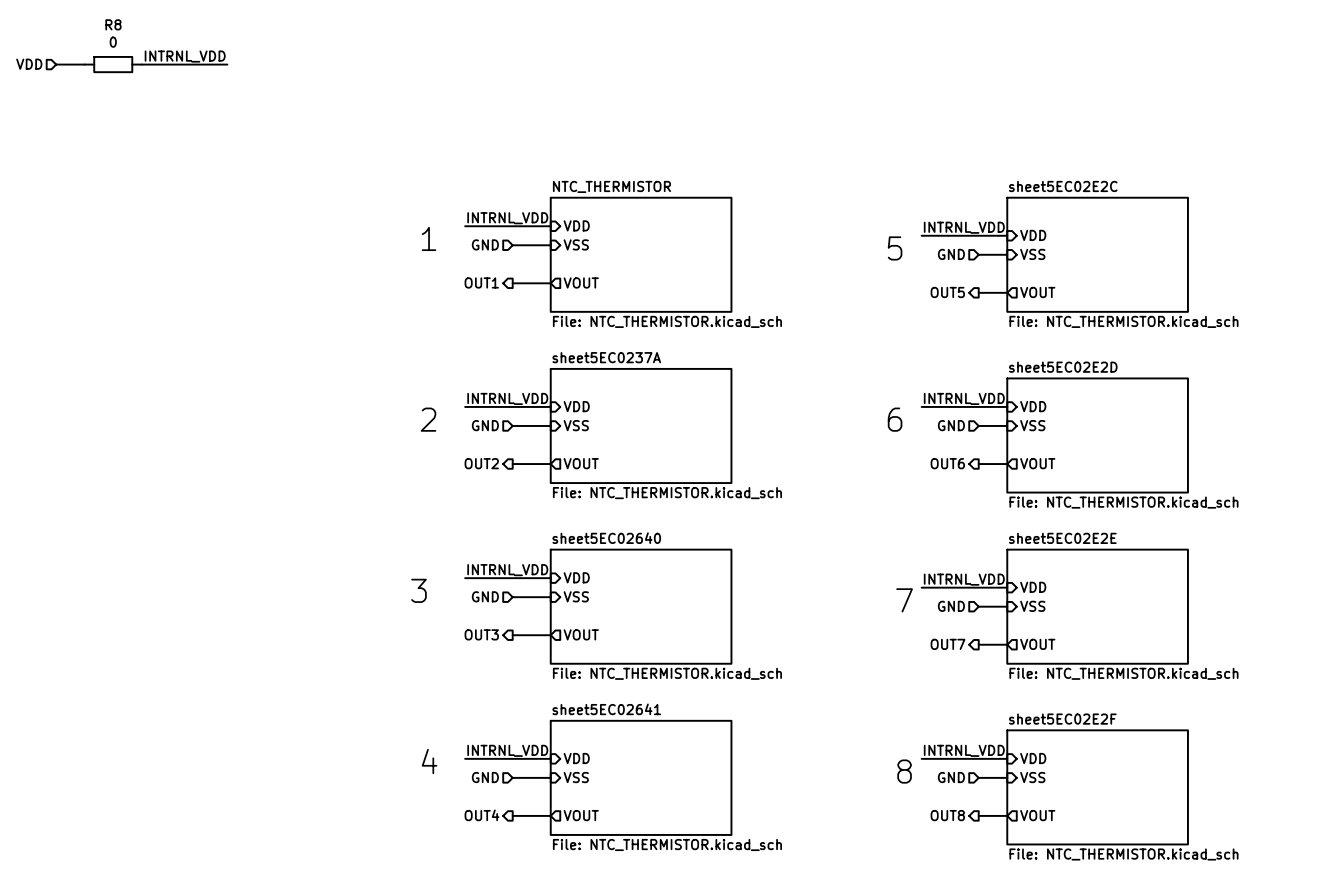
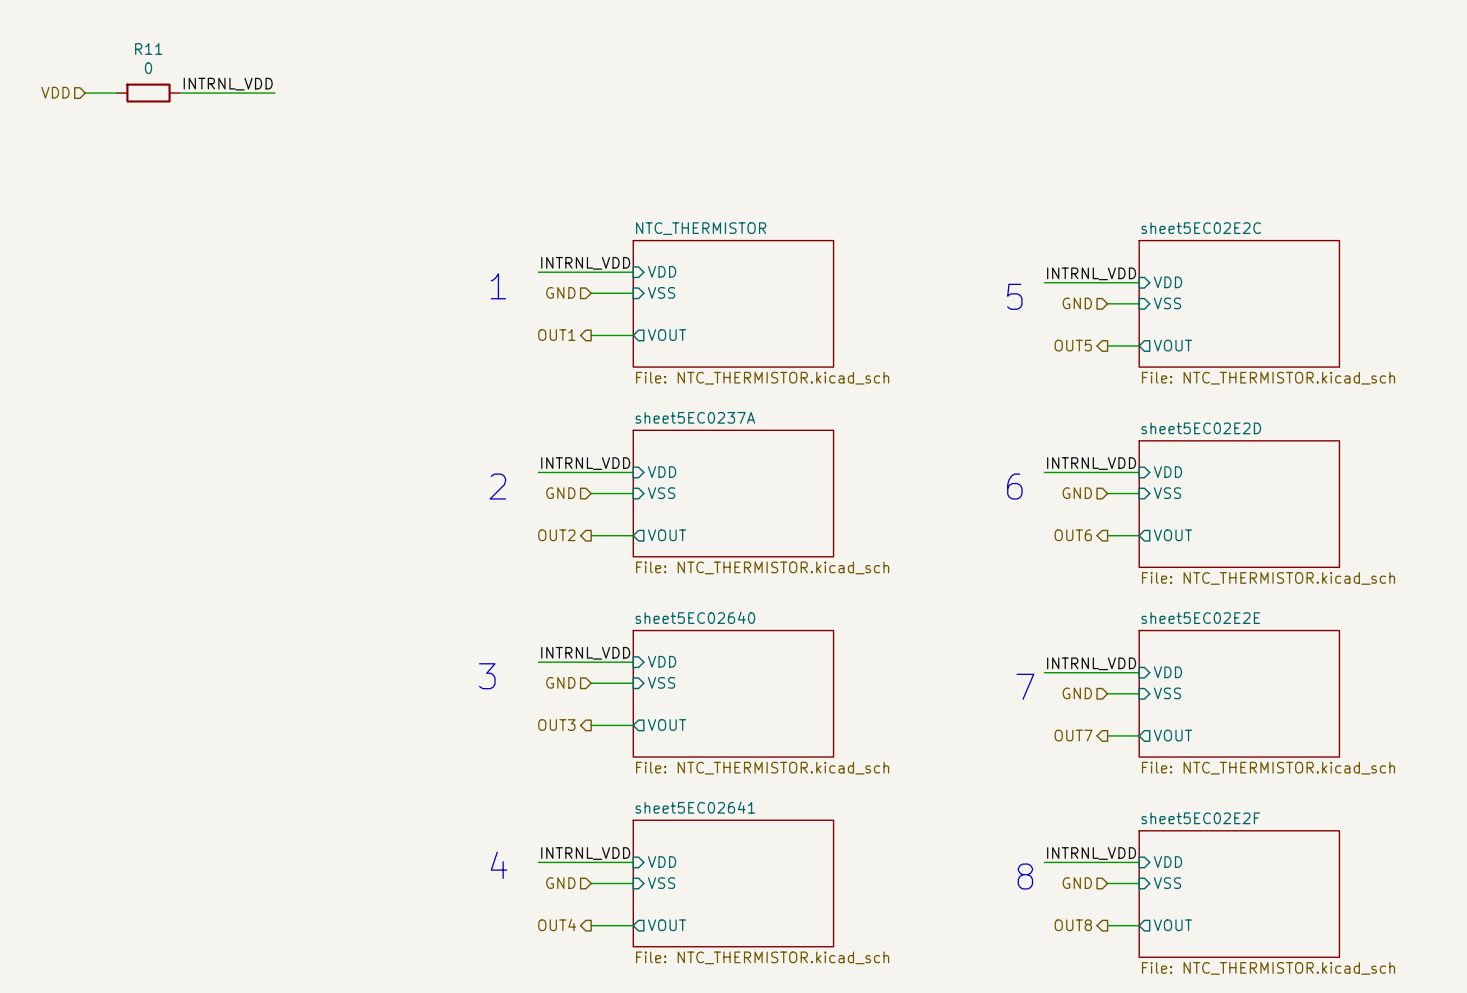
R8 name: R8 (113, 24) -> R11 (148, 49)

